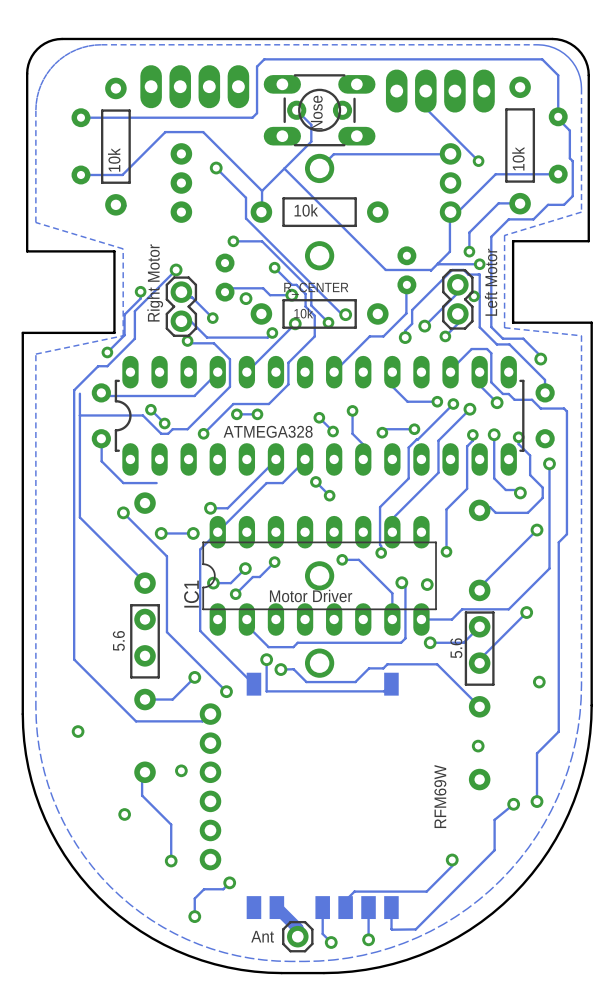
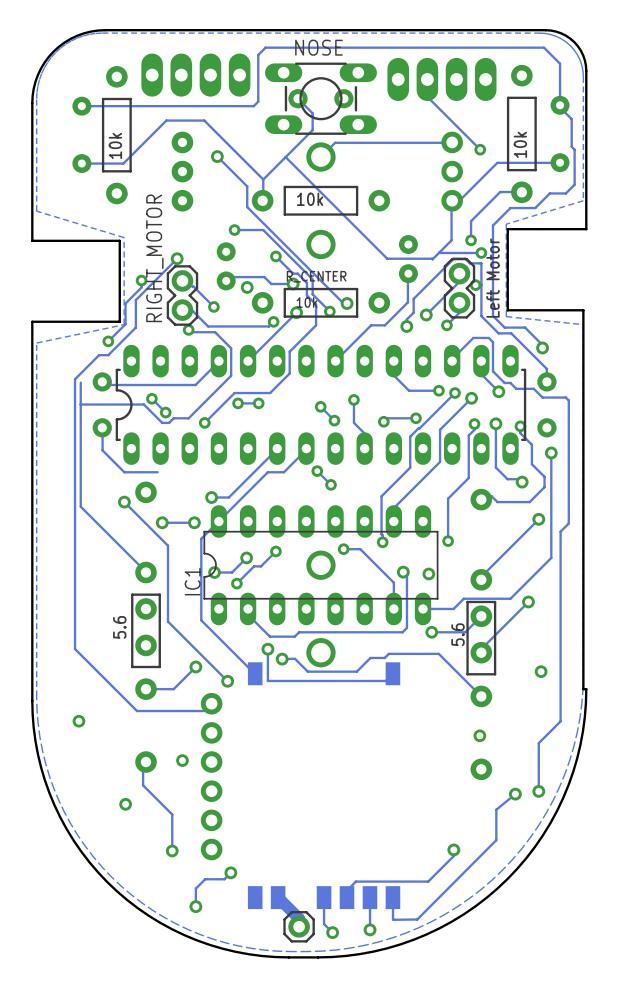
NOSE name: none -> NOSE (319, 47)
text: Nose (316, 112) -> none
RIGHT_MOTOR name: none -> RIGHT_MOTOR (154, 258)
text: Right Motor (155, 282) -> none
board edge: (114, 332) (114, 251) (27, 251) (27, 69) (31, 56) (44, 43) (62, 38) (552, 38) (570, 43) (583, 57) (588, 75) (588, 241) (513, 241) (513, 322) (591, 322) (591, 705) (588, 747) (573, 801) (548, 851) (513, 894) (481, 921) (457, 937) (406, 959) (365, 969) (323, 973) (268, 972) (241, 969) (201, 960) (152, 938) (108, 906) (72, 866) (51, 831) (35, 794) (25, 754) (23, 727) (22, 332) (31, 332) -> (115, 321) (119, 321) (119, 240) (32, 240) (33, 88) (44, 62) (58, 46) (70, 38) (84, 33) (105, 30) (545, 30) (565, 35) (580, 50) (586, 71) (586, 229) (507, 229) (507, 310) (583, 310) (583, 689) (586, 689) (582, 731) (568, 785) (543, 835) (507, 878) (475, 906) (452, 921) (400, 944) (360, 954) (332, 957) (288, 957) (235, 951) (184, 935) (149, 916) (107, 882) (81, 851) (60, 817) (49, 792) (37, 754) (33, 727) (32, 321)
text: ATMEGA328 (268, 431) -> none
text: Motor Driver (311, 596) -> none
text: RFM69W (440, 796) -> none
text: Ant (262, 936) -> none

